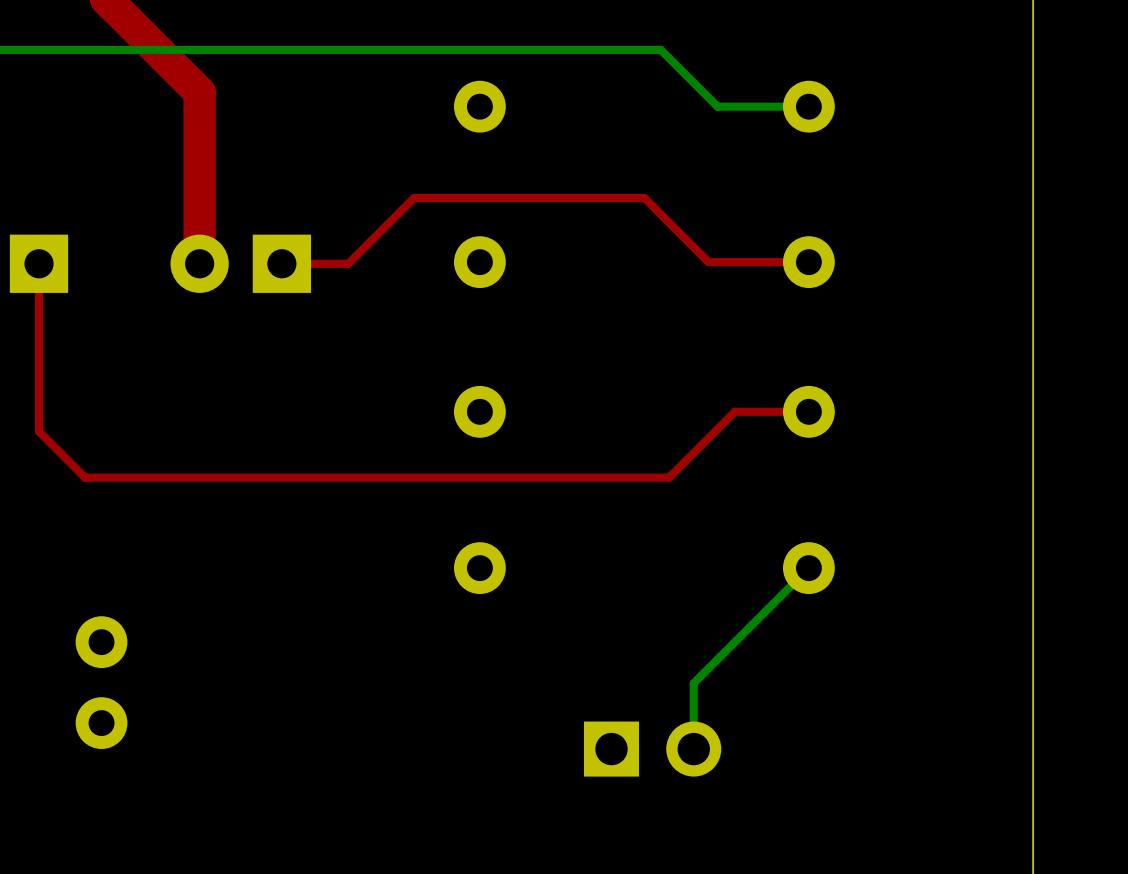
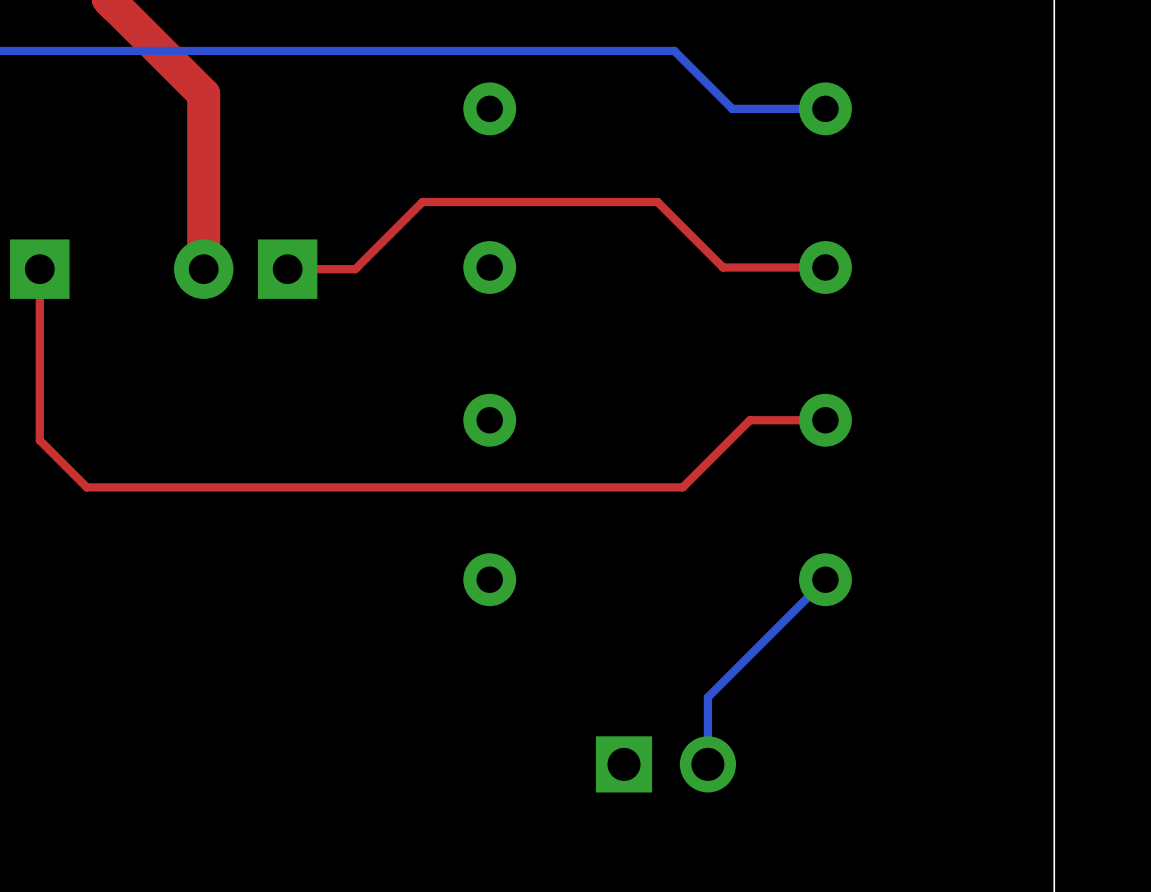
part: (101, 682) -> none

